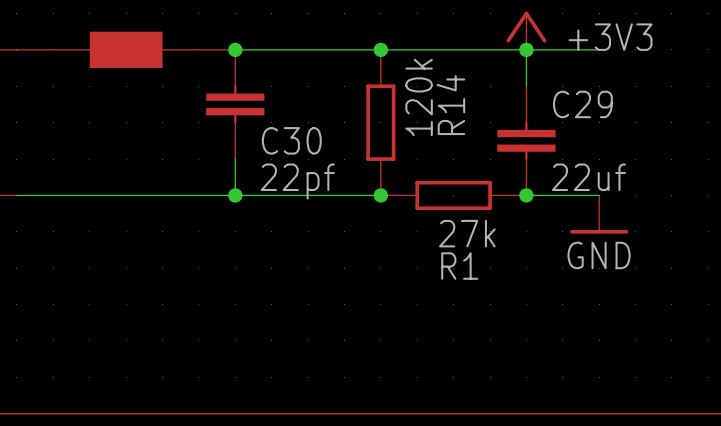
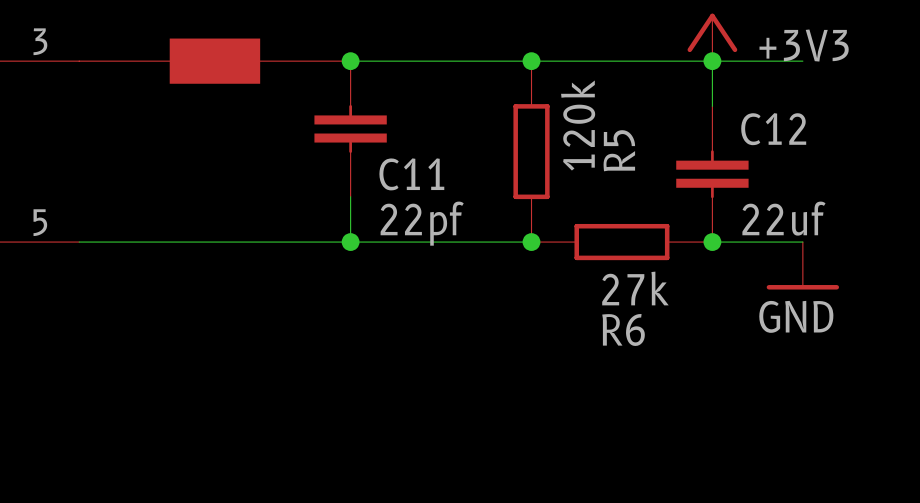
C29 name: C29 (582, 104) -> C12 (773, 129)
R14 name: R14 (450, 105) -> R5 (619, 150)
C30 name: C30 (291, 140) -> C11 (411, 174)
R1 name: R1 (459, 266) -> R6 (623, 329)

